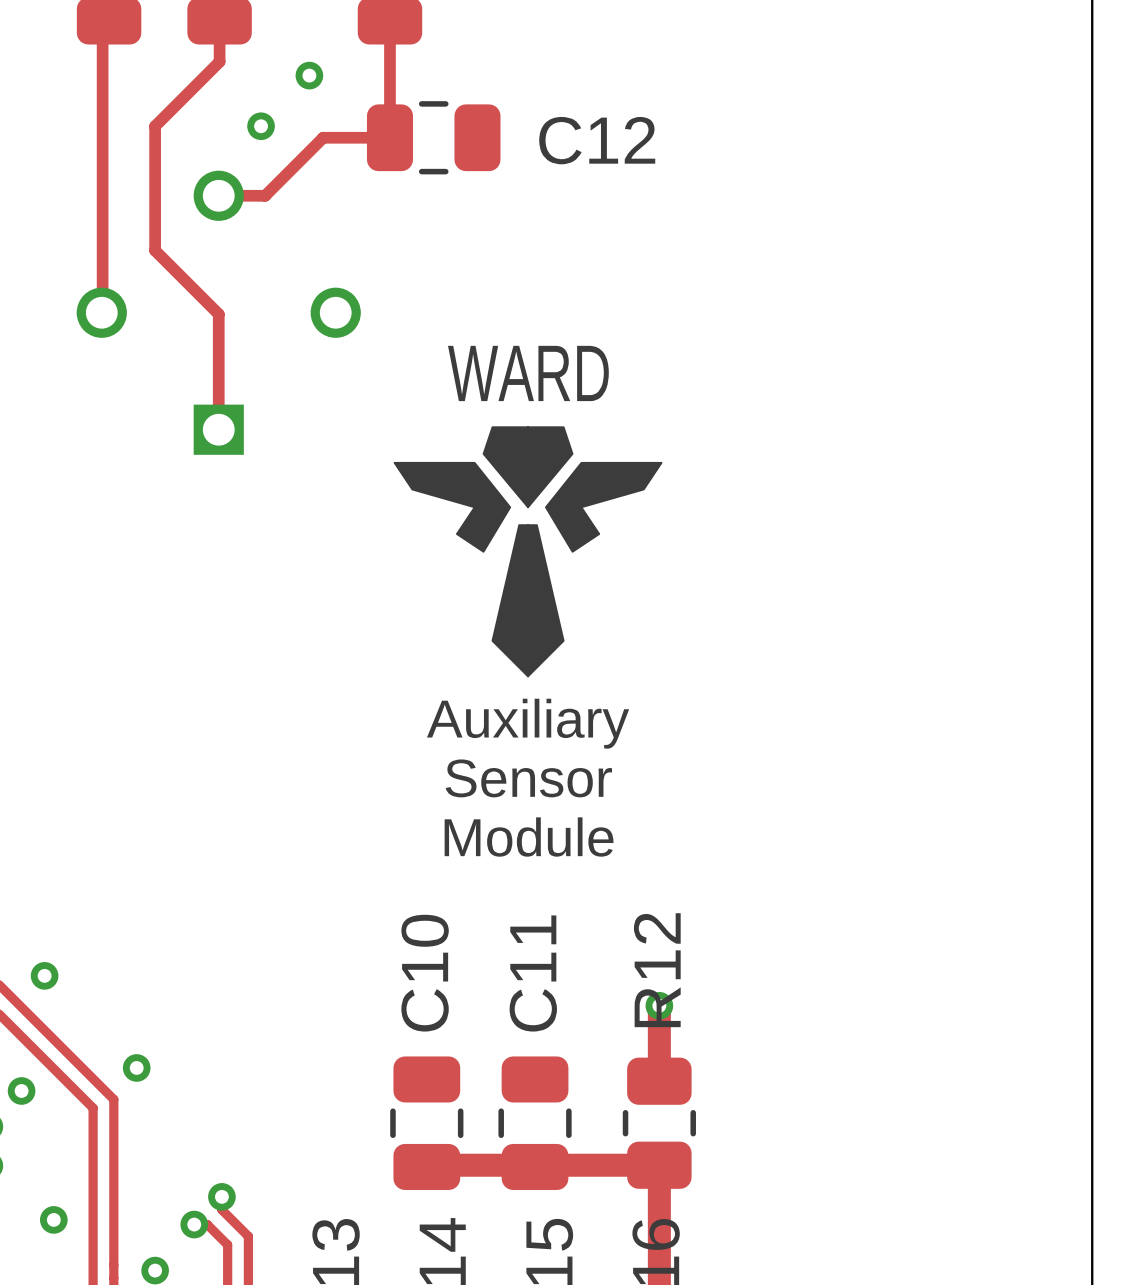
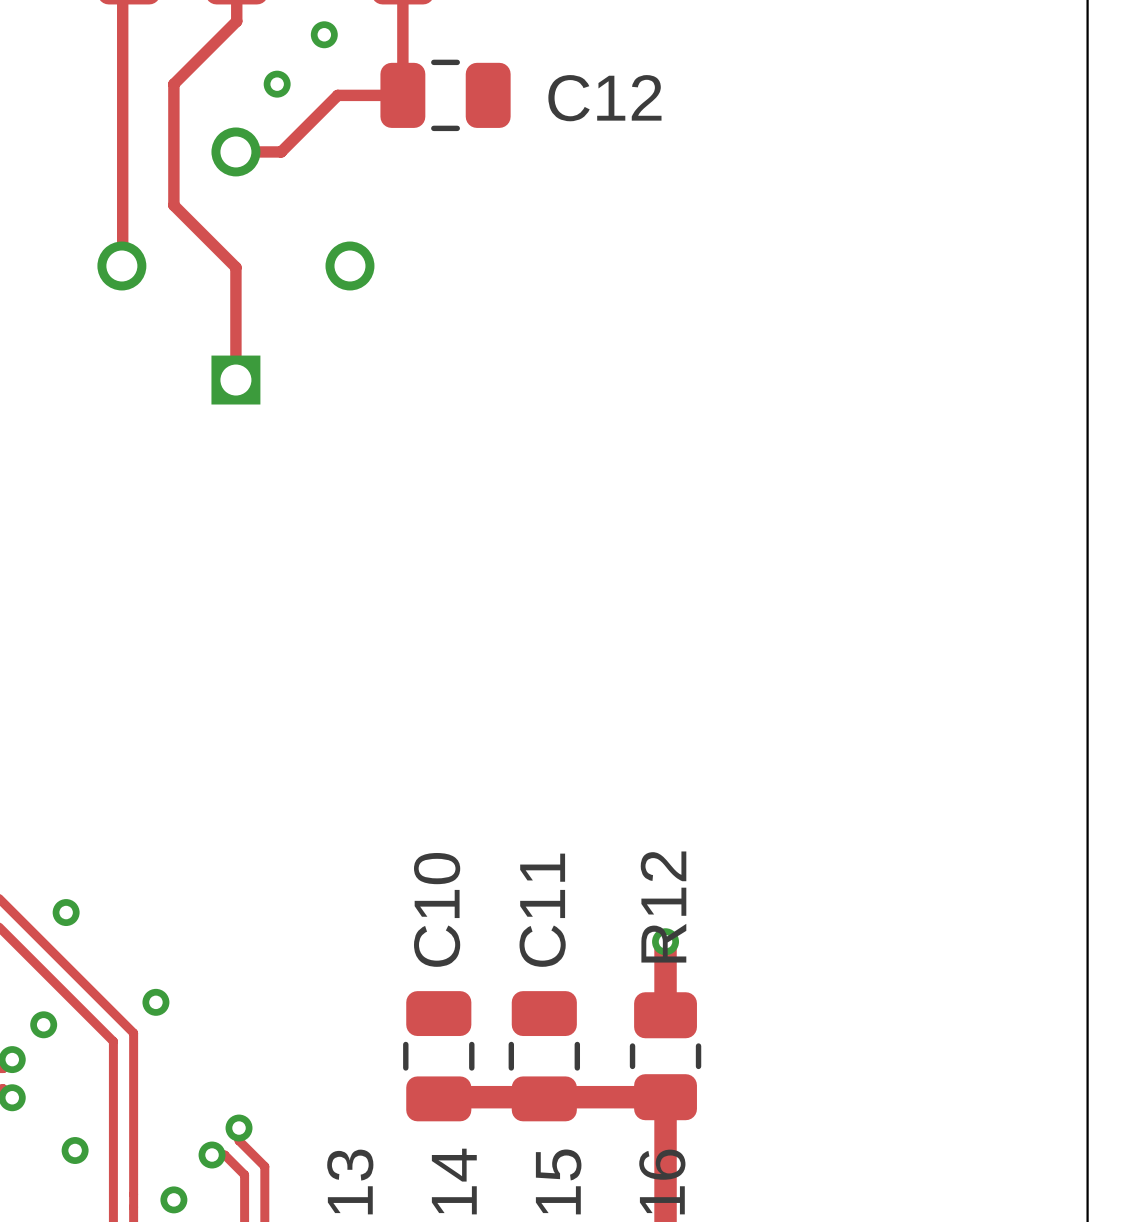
text: WARD (528, 373) -> none
drawing: [393, 426, 663, 678] -> none
text: Auxiliary (528, 723) -> none
text: Sensor (528, 778) -> none
text: Module (529, 837) -> none

